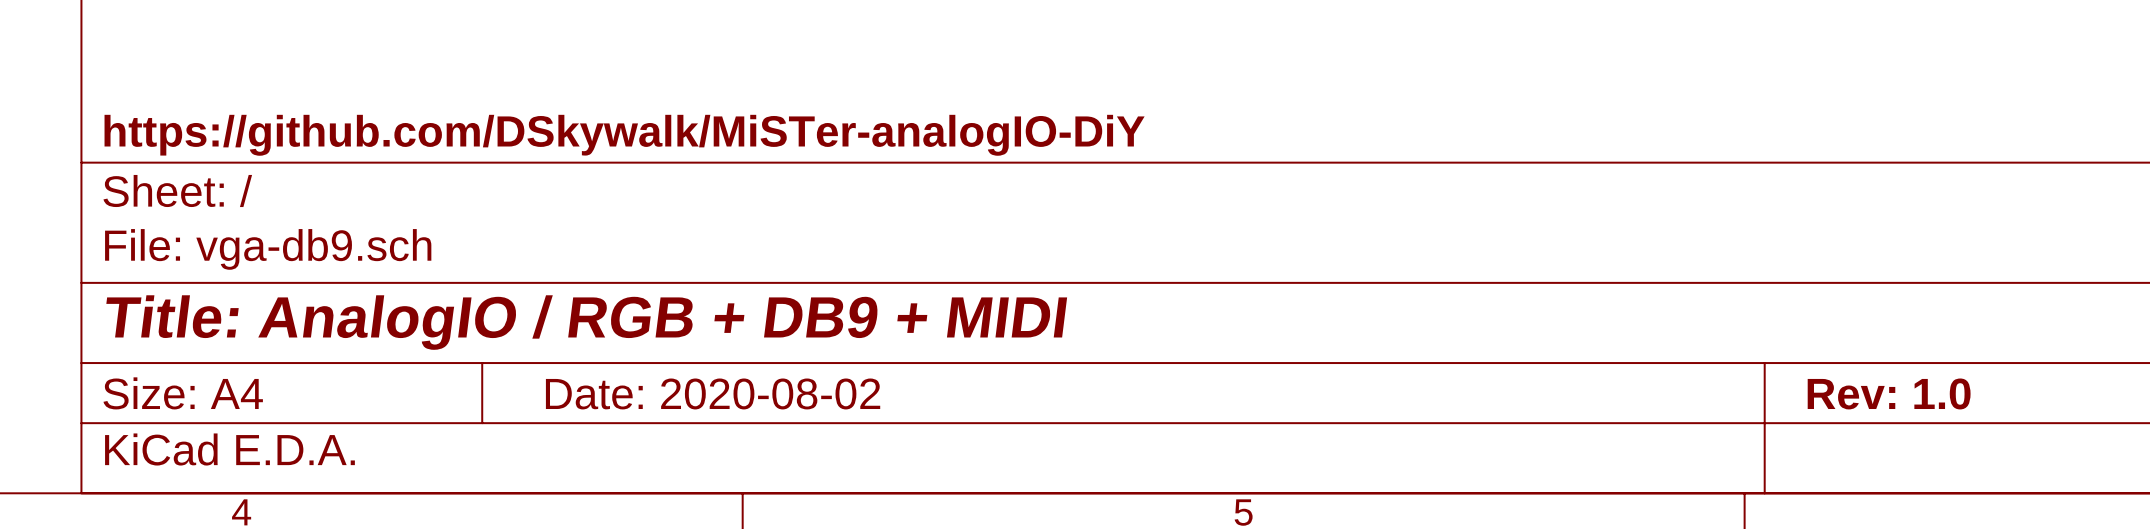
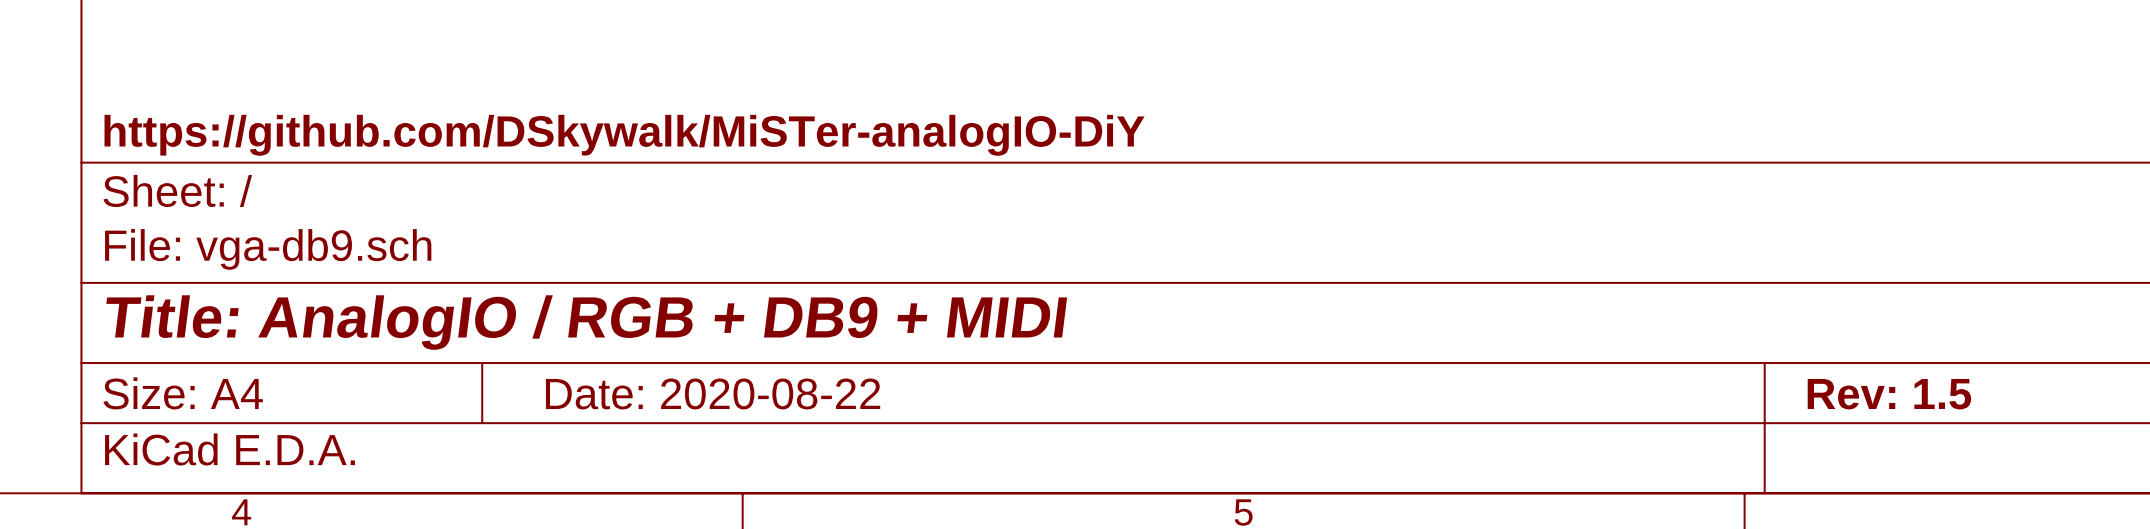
title block: Date: 2020-08-02 (713, 393) -> Date: 2020-08-22 (713, 393)
title block: Rev: 1.0 (1889, 393) -> Rev: 1.5 (1889, 394)

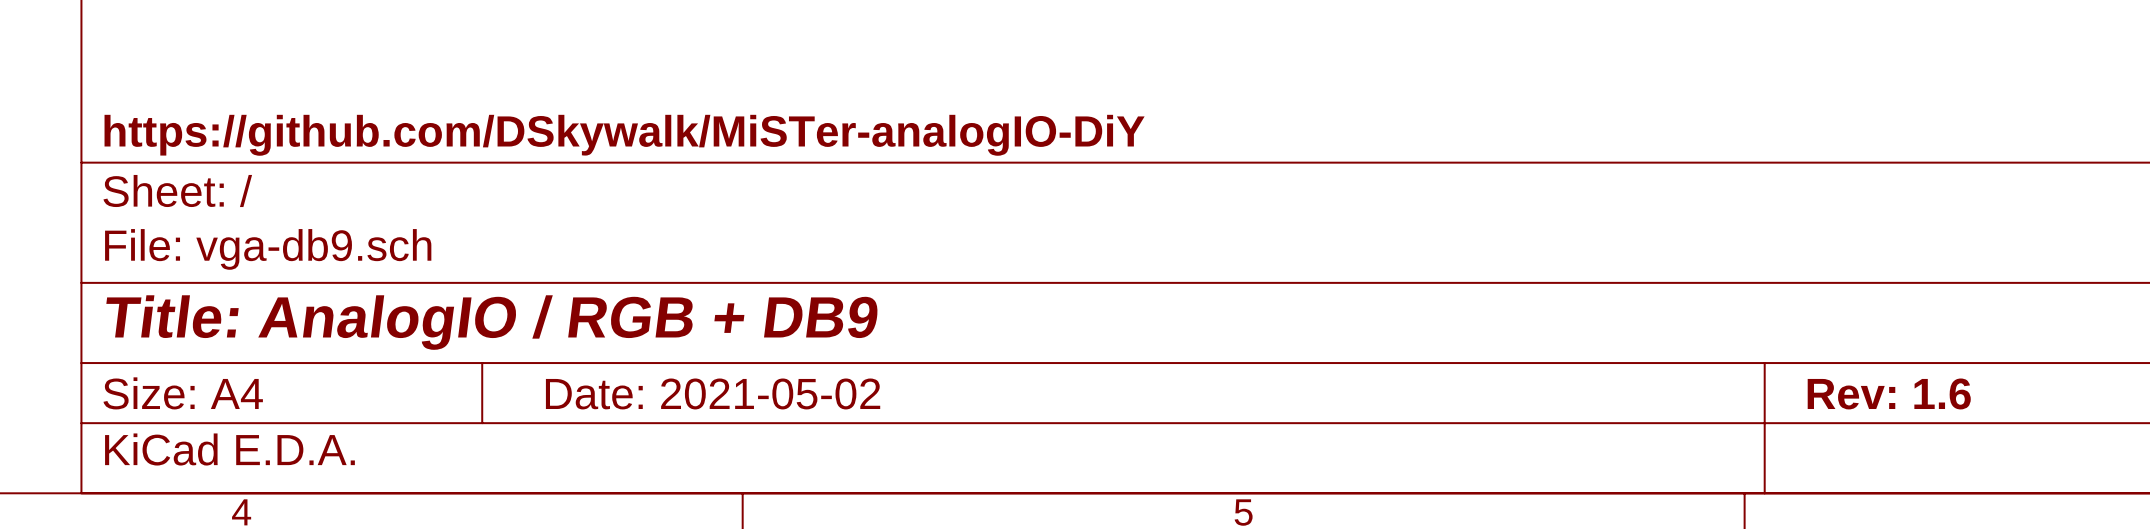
title block: Title: AnalogIO / RGB + DB9 + MIDI (586, 322) -> Title: AnalogIO / RGB + DB9 (492, 322)
title block: Date: 2020-08-22 (713, 393) -> Date: 2021-05-02 (713, 393)
title block: Rev: 1.5 (1889, 394) -> Rev: 1.6 (1889, 393)

